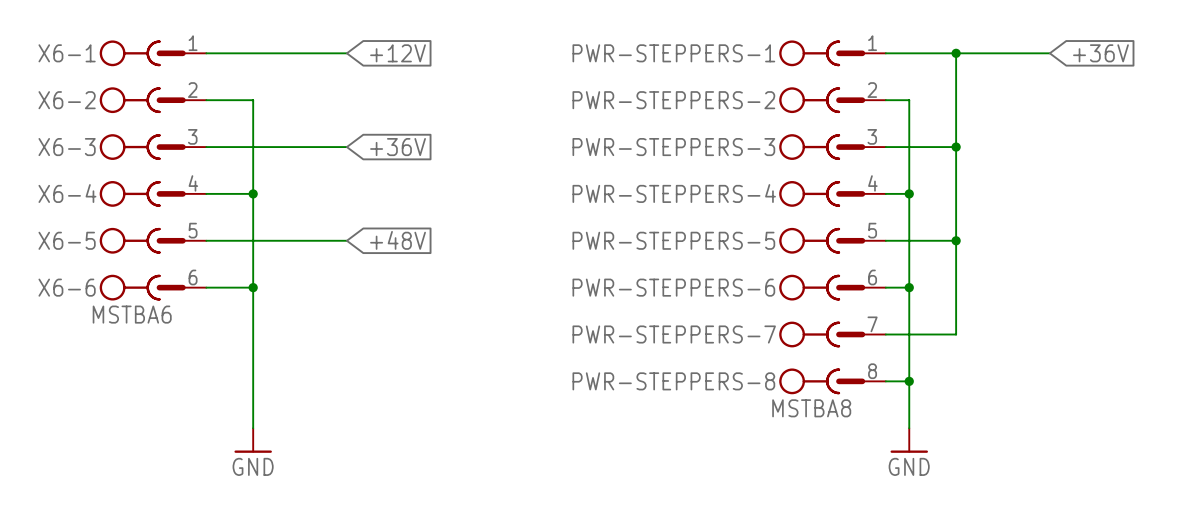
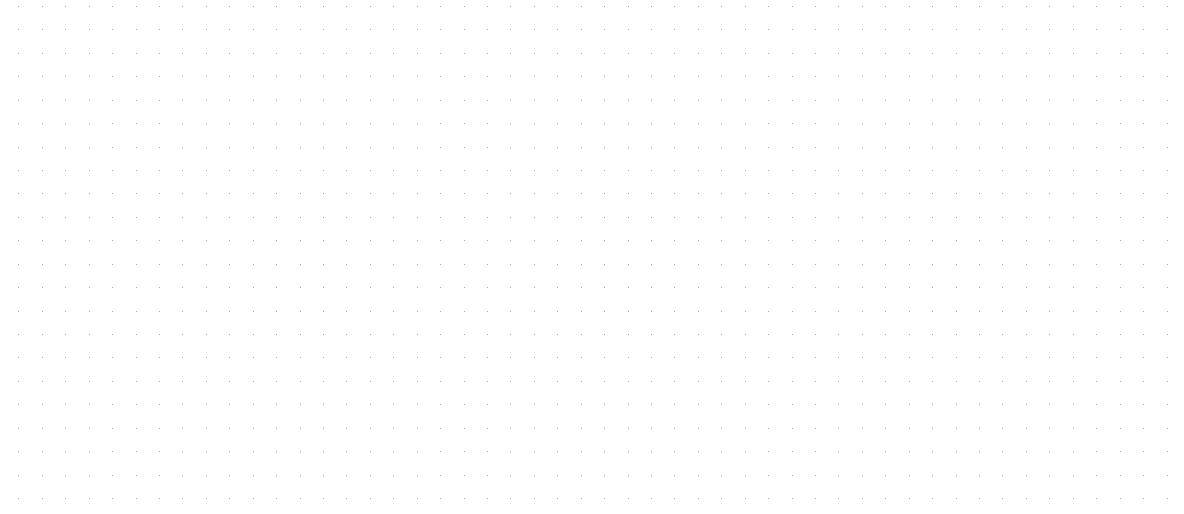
X6-1: (153, 53) -> none
wire: (206, 53) (346, 53) -> none
global label: +12V (398, 53) -> none
PWR-STEPPERS-1: (832, 53) -> none
wire: (885, 53) (1049, 53) -> none
wire: (956, 53) (956, 334) (885, 334) -> none
junction: (956, 53) -> none
global label: +36V (1100, 53) -> none
X6-2: (153, 100) -> none
wire: (206, 100) (253, 100) (253, 428) -> none
PWR-STEPPERS-2: (832, 100) -> none
wire: (885, 100) (909, 100) (909, 428) -> none
X6-3: (153, 147) -> none
wire: (206, 147) (346, 147) -> none
global label: +36V (398, 147) -> none
PWR-STEPPERS-3: (832, 147) -> none
wire: (885, 147) (956, 147) -> none
junction: (956, 147) -> none
X6-4: (153, 193) -> none
wire: (206, 193) (253, 193) -> none
junction: (253, 193) -> none
PWR-STEPPERS-4: (832, 193) -> none
wire: (885, 193) (909, 193) -> none
junction: (909, 193) -> none
X6-5: (153, 240) -> none
wire: (206, 240) (346, 240) -> none
global label: +48V (398, 240) -> none
PWR-STEPPERS-5: (832, 240) -> none
wire: (885, 240) (956, 240) -> none
junction: (956, 240) -> none
X6-6: MSTBA6 (153, 287) -> none
wire: (206, 287) (253, 287) -> none
junction: (253, 287) -> none
PWR-STEPPERS-6: (832, 287) -> none
wire: (885, 287) (909, 287) -> none
junction: (909, 287) -> none
PWR-STEPPERS-7: (832, 334) -> none
PWR-STEPPERS-8: MSTBA8 (832, 381) -> none
wire: (885, 381) (909, 381) -> none
junction: (909, 381) -> none
power symbol: GND (253, 440) -> none
power symbol: GND (909, 440) -> none

